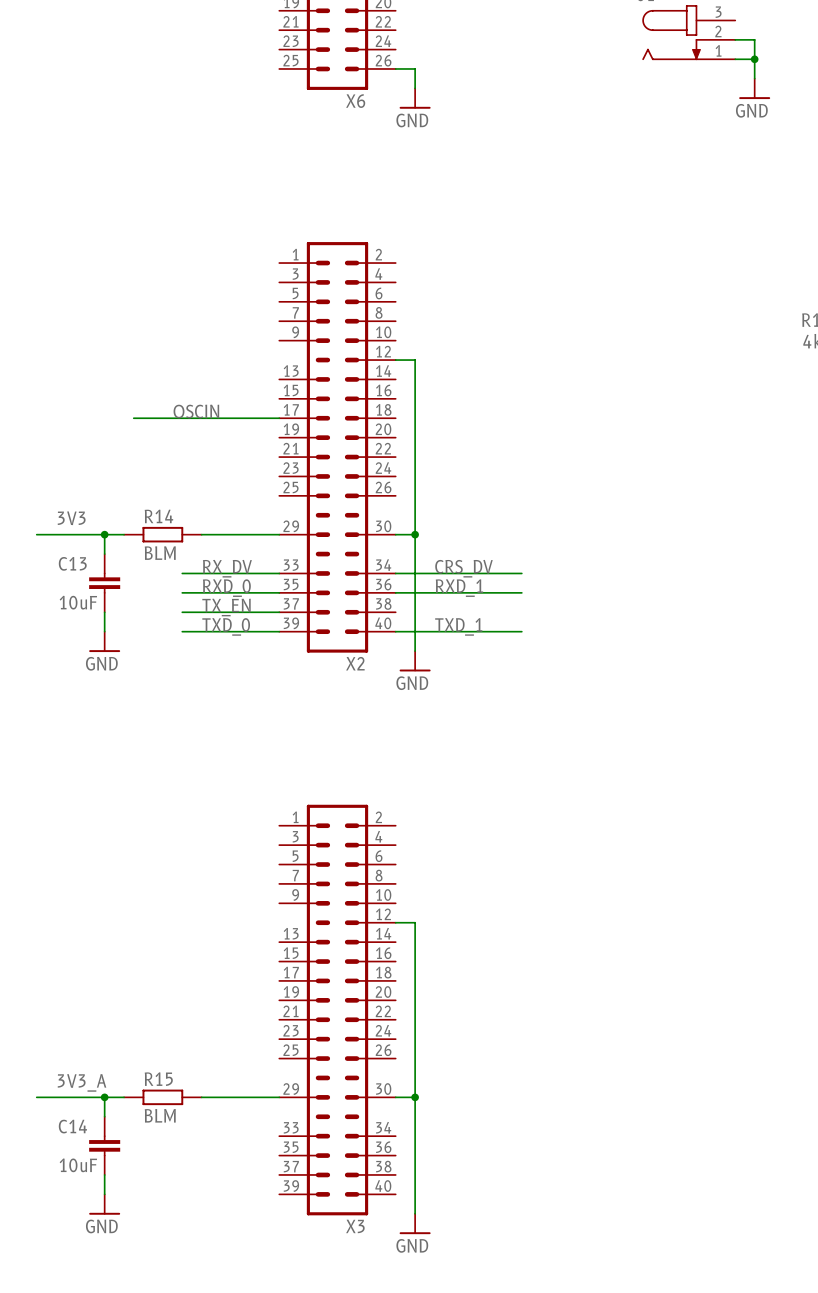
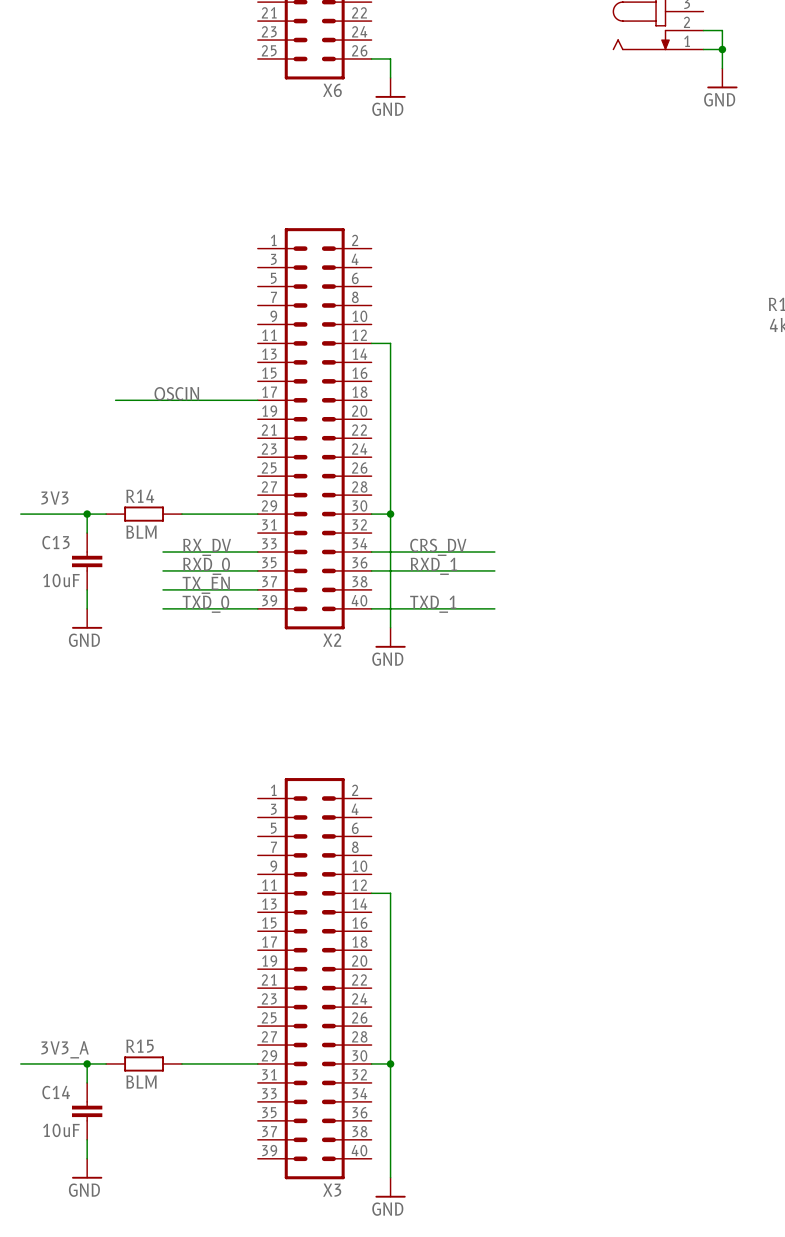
X2 symbol: [279, 242, 396, 653] -> [257, 228, 372, 630]
X3 symbol: [279, 804, 396, 1216] -> [257, 778, 372, 1180]

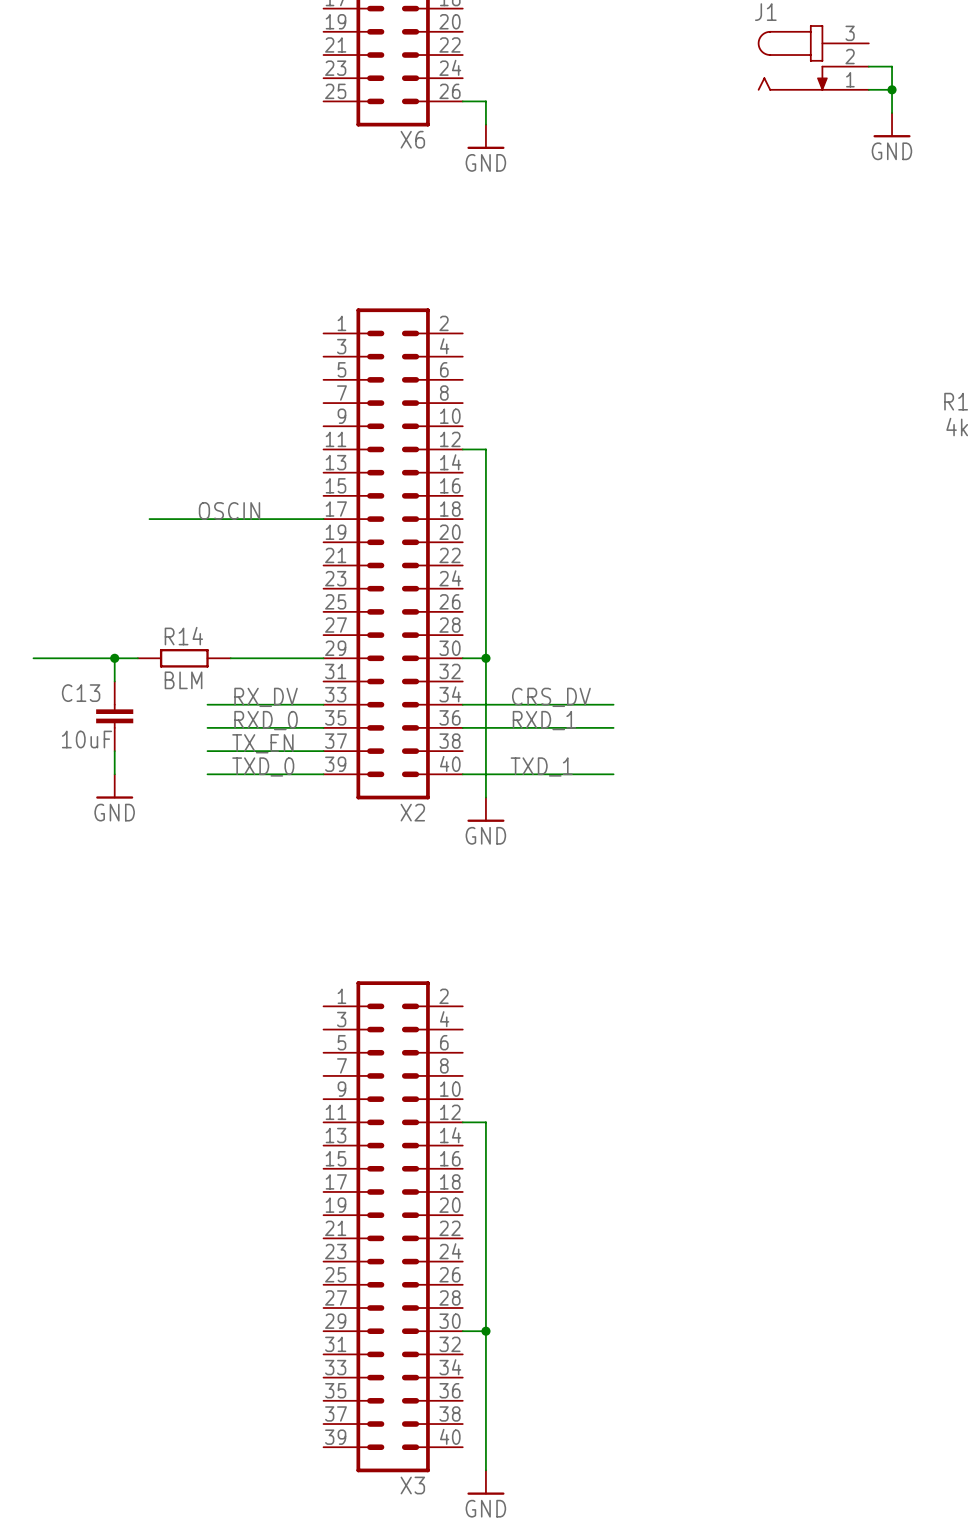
label: 3V3 (54, 498) -> none
label: 3V3_A (65, 1049) -> none
wire: (20, 1063) (106, 1063) -> none
wire: (87, 1063) (87, 1082) -> none
junction: (87, 1063) -> none
R15: BLM (144, 1063) -> none
wire: (181, 1063) (257, 1063) -> none
C14: 10uF (87, 1111) -> none
wire: (87, 1139) (87, 1158) -> none
power symbol: GND (87, 1168) -> none

